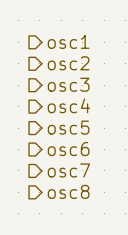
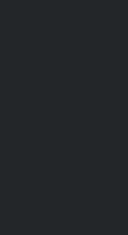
hierarchical label: osc1 (68, 41) -> none
hierarchical label: osc2 (68, 63) -> none
hierarchical label: osc3 (68, 84) -> none
hierarchical label: osc4 (68, 105) -> none
hierarchical label: osc5 (68, 127) -> none
hierarchical label: osc6 (68, 149) -> none
hierarchical label: osc7 (68, 170) -> none
hierarchical label: osc8 (68, 191) -> none

